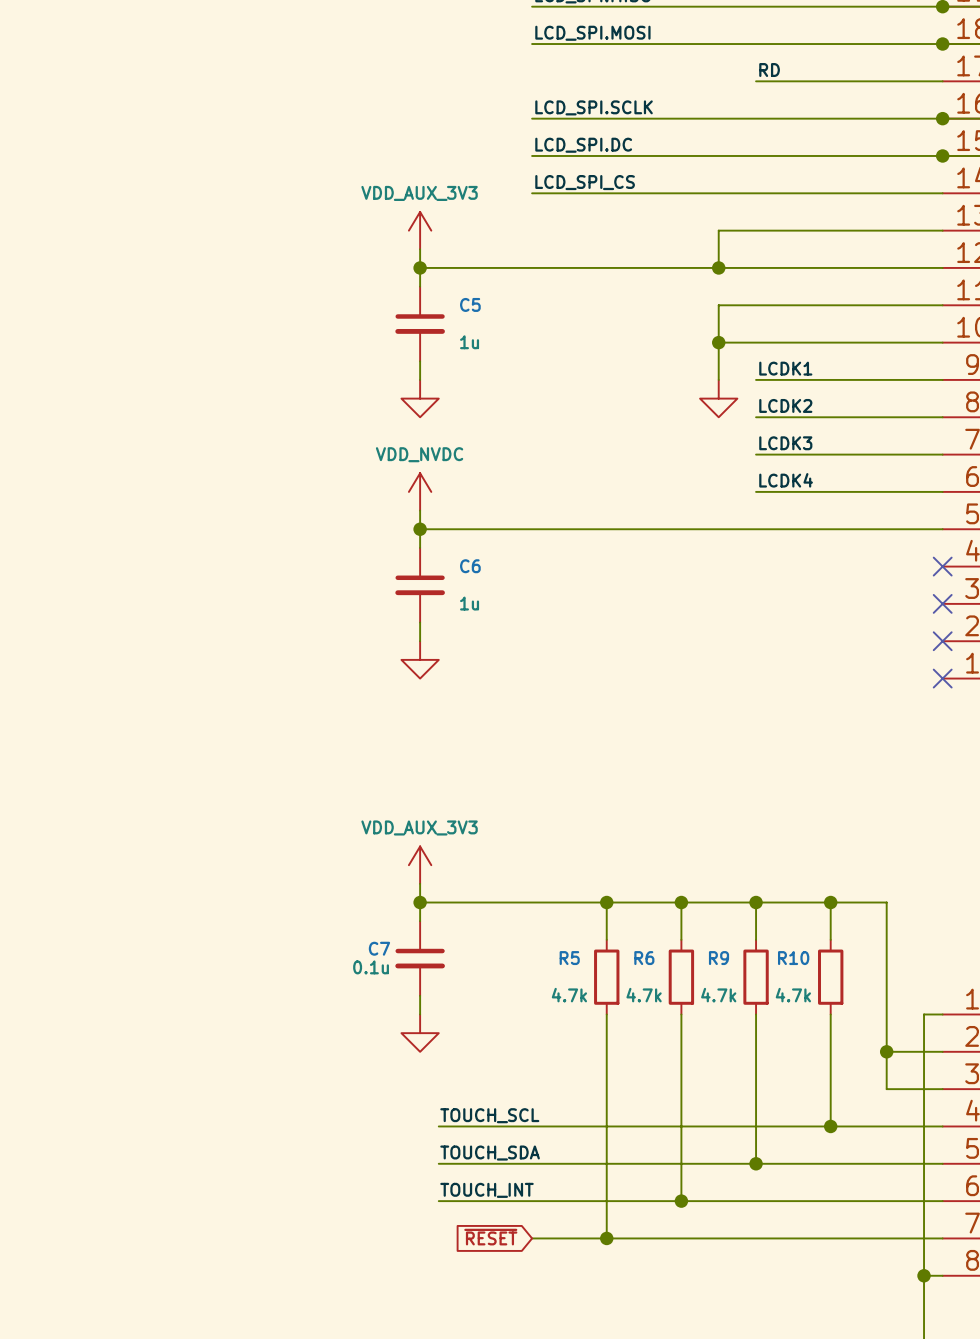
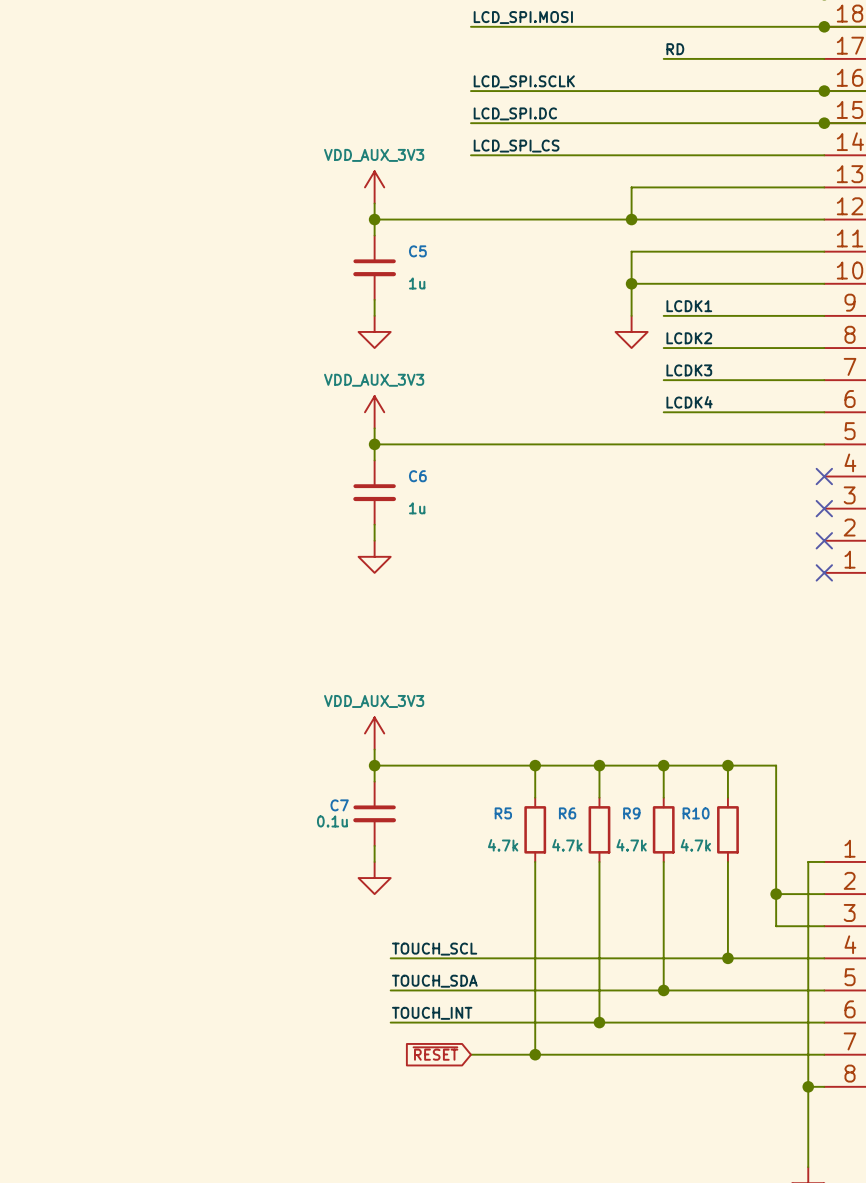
power symbol: VDD_NVDC (420, 491) -> VDD_AUX_3V3 (374, 412)

